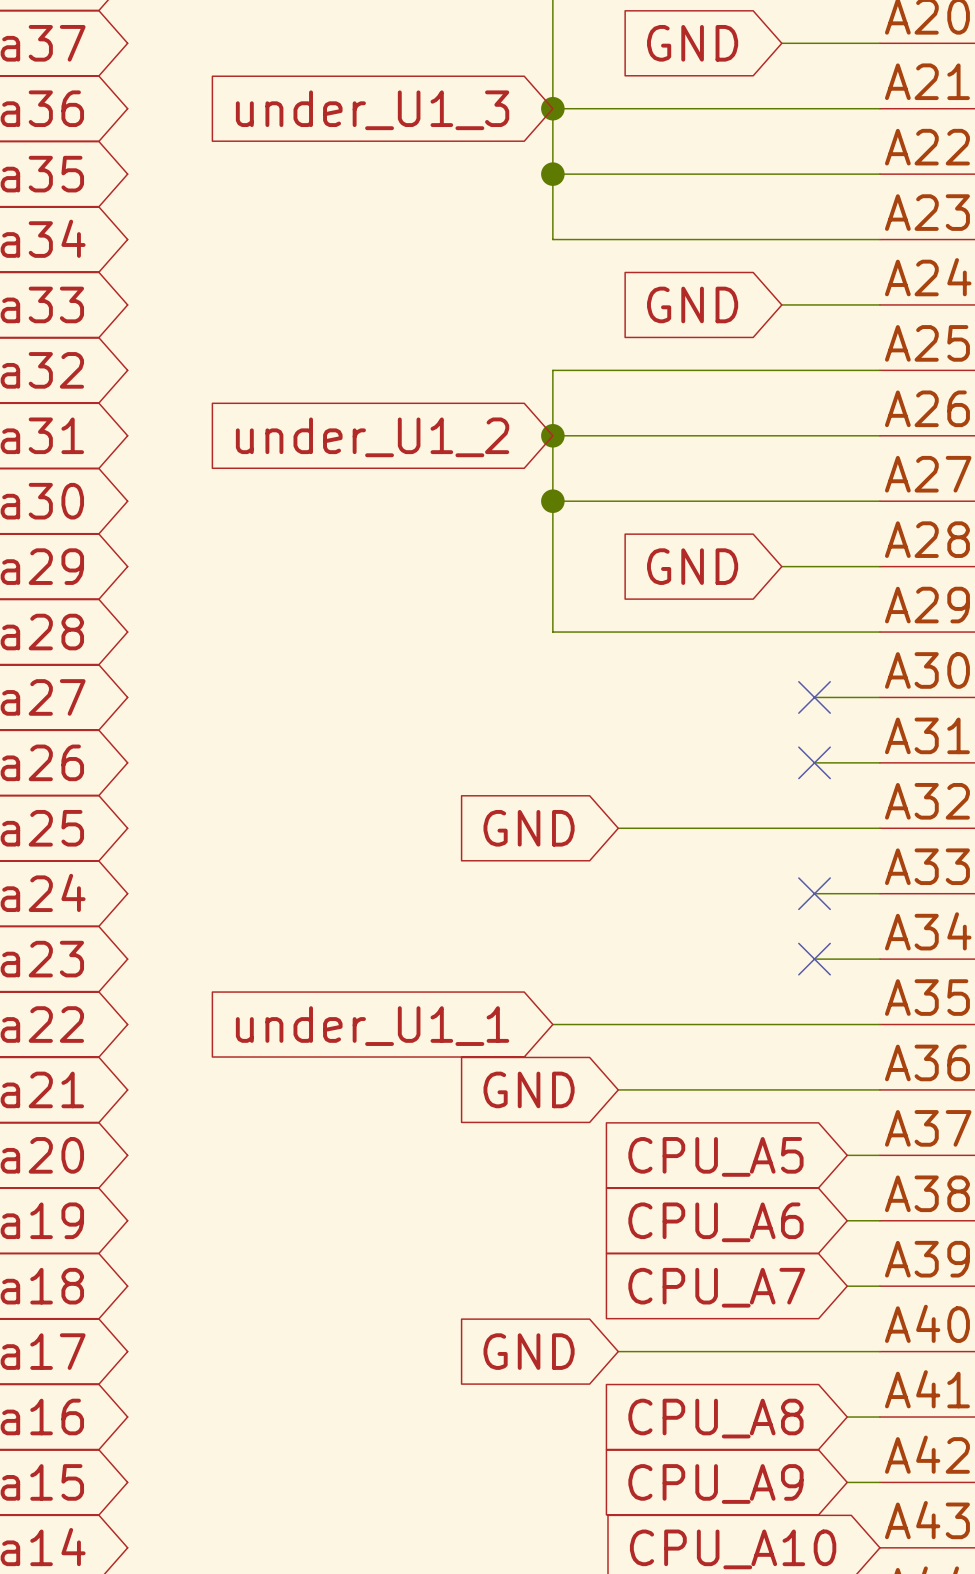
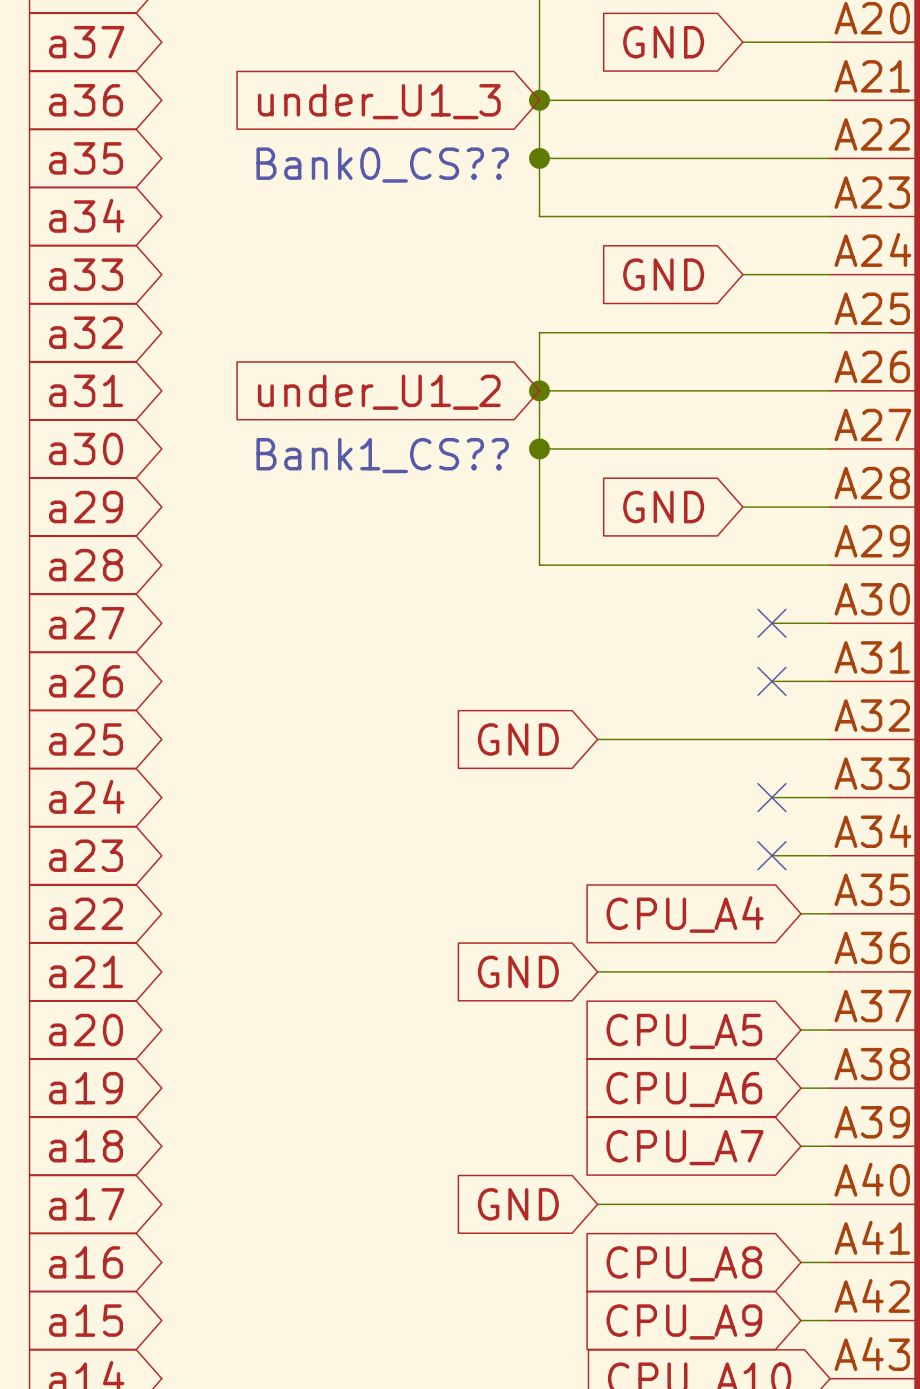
text: none -> Bank0_CS?? (382, 165)
text: none -> Bank1_CS?? (382, 455)
wire: (552, 1024) (847, 1024) -> none
global label: none -> CPU_A4 (685, 914)
global label: under_U1_1 (372, 1026) -> none

